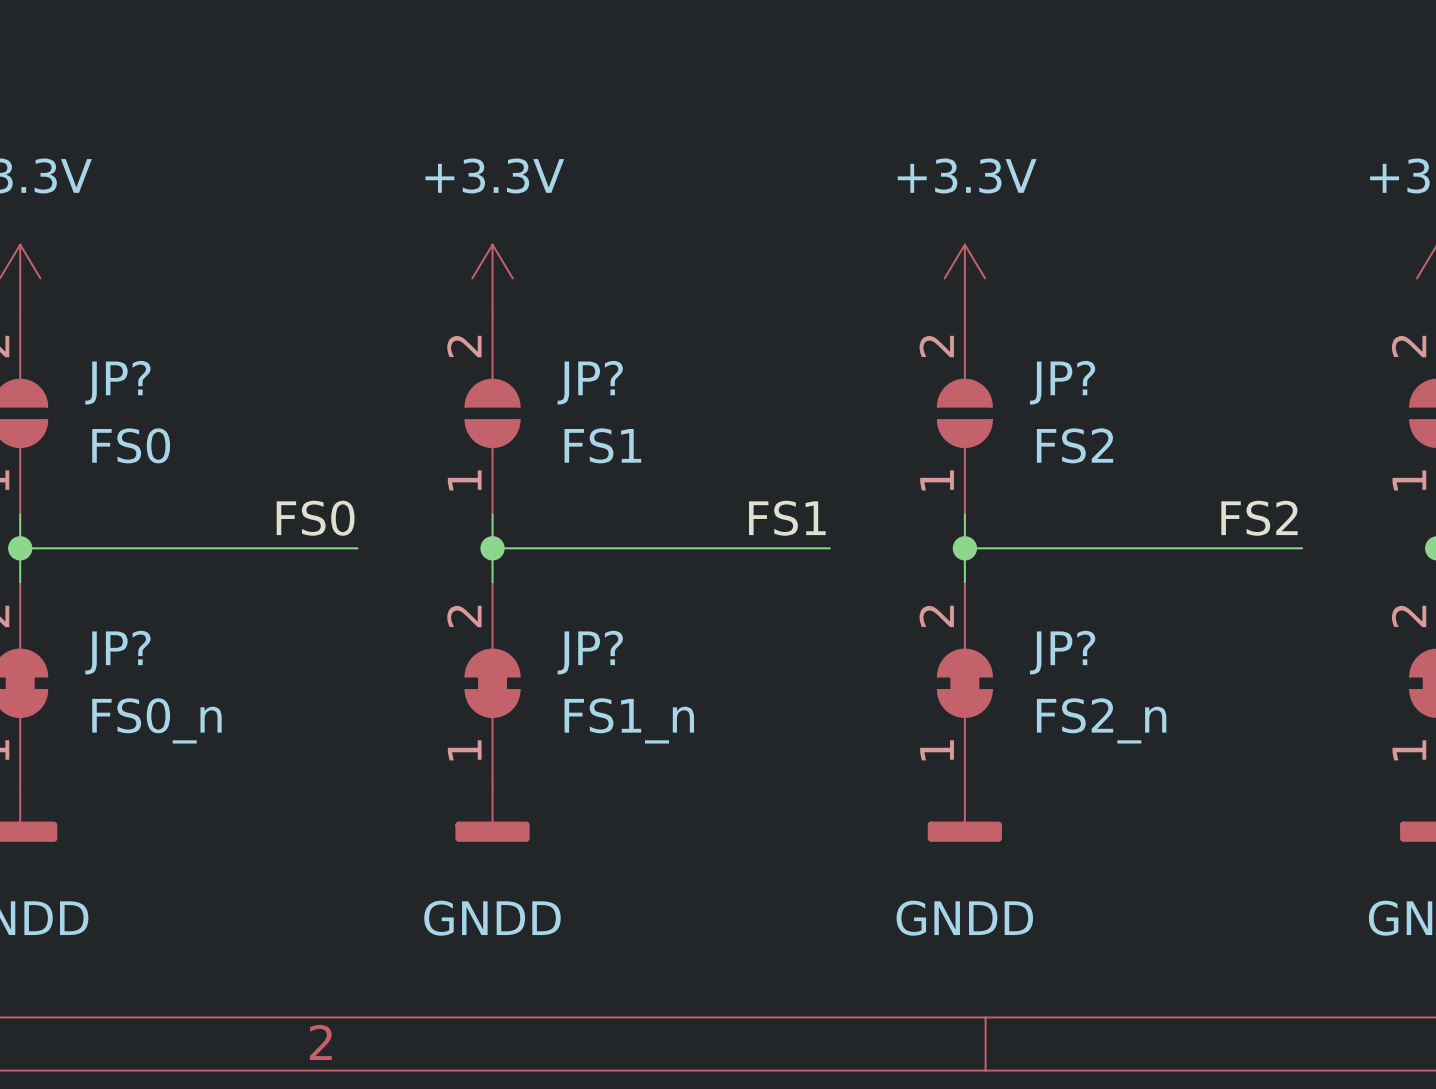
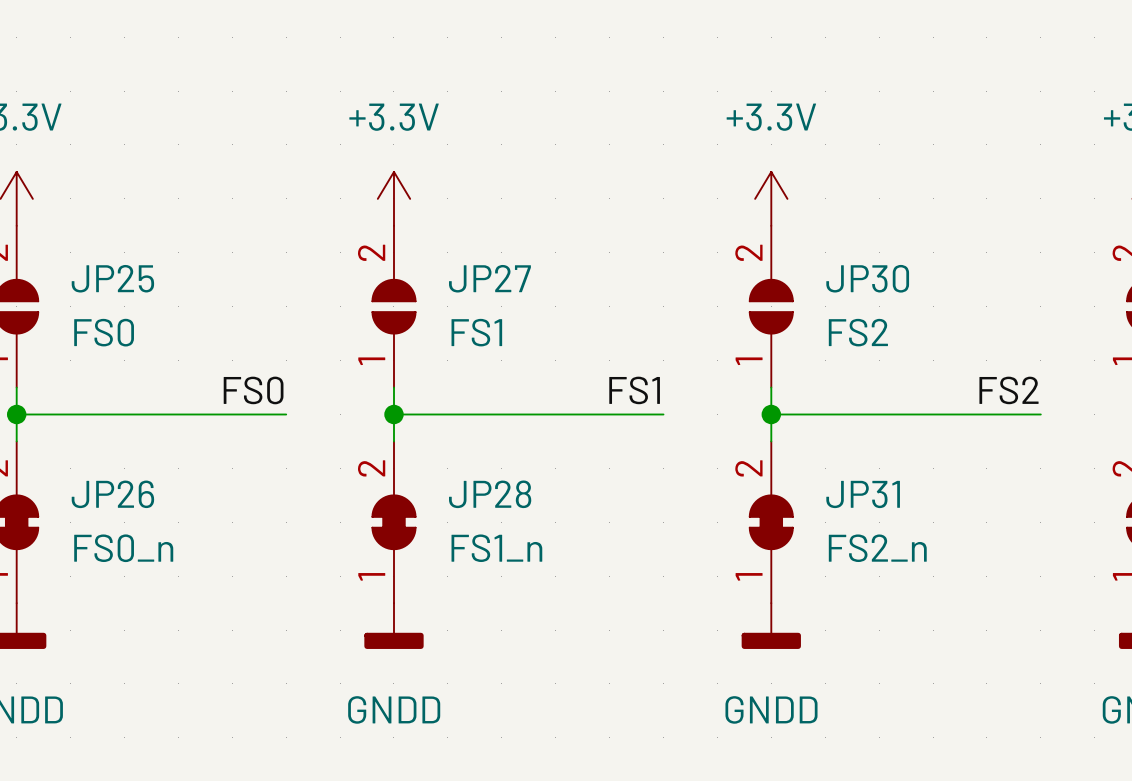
JP? name: JP? (117, 382) -> JP25 (112, 278)
JP? name: JP? (590, 382) -> JP27 (489, 278)
JP? name: JP? (1062, 382) -> JP30 (867, 278)
JP? name: JP? (117, 652) -> JP26 (112, 494)
JP? name: JP? (590, 652) -> JP28 (490, 494)
JP? name: JP? (1062, 652) -> JP31 (863, 494)

